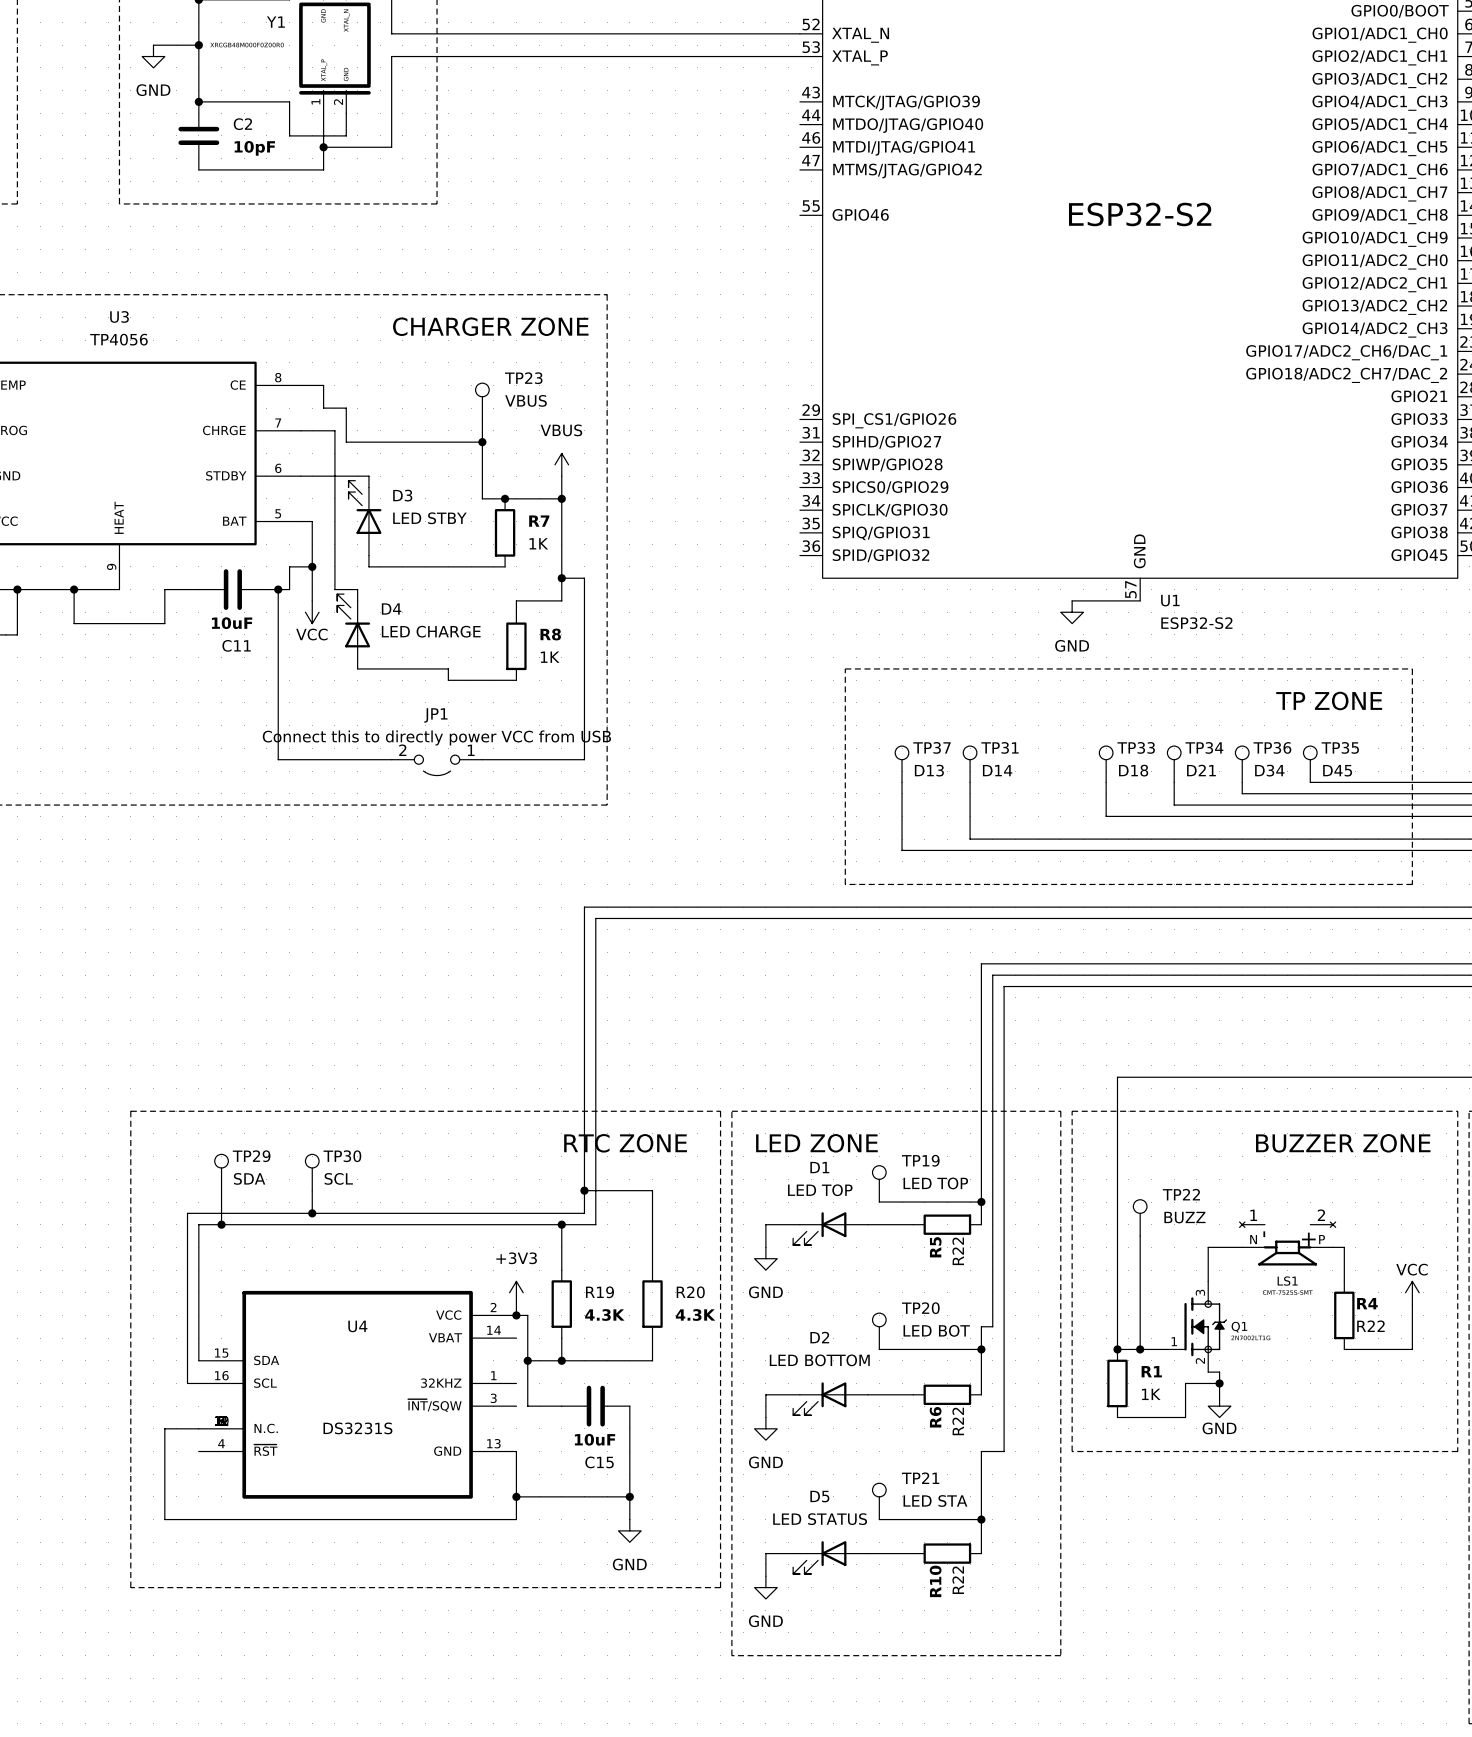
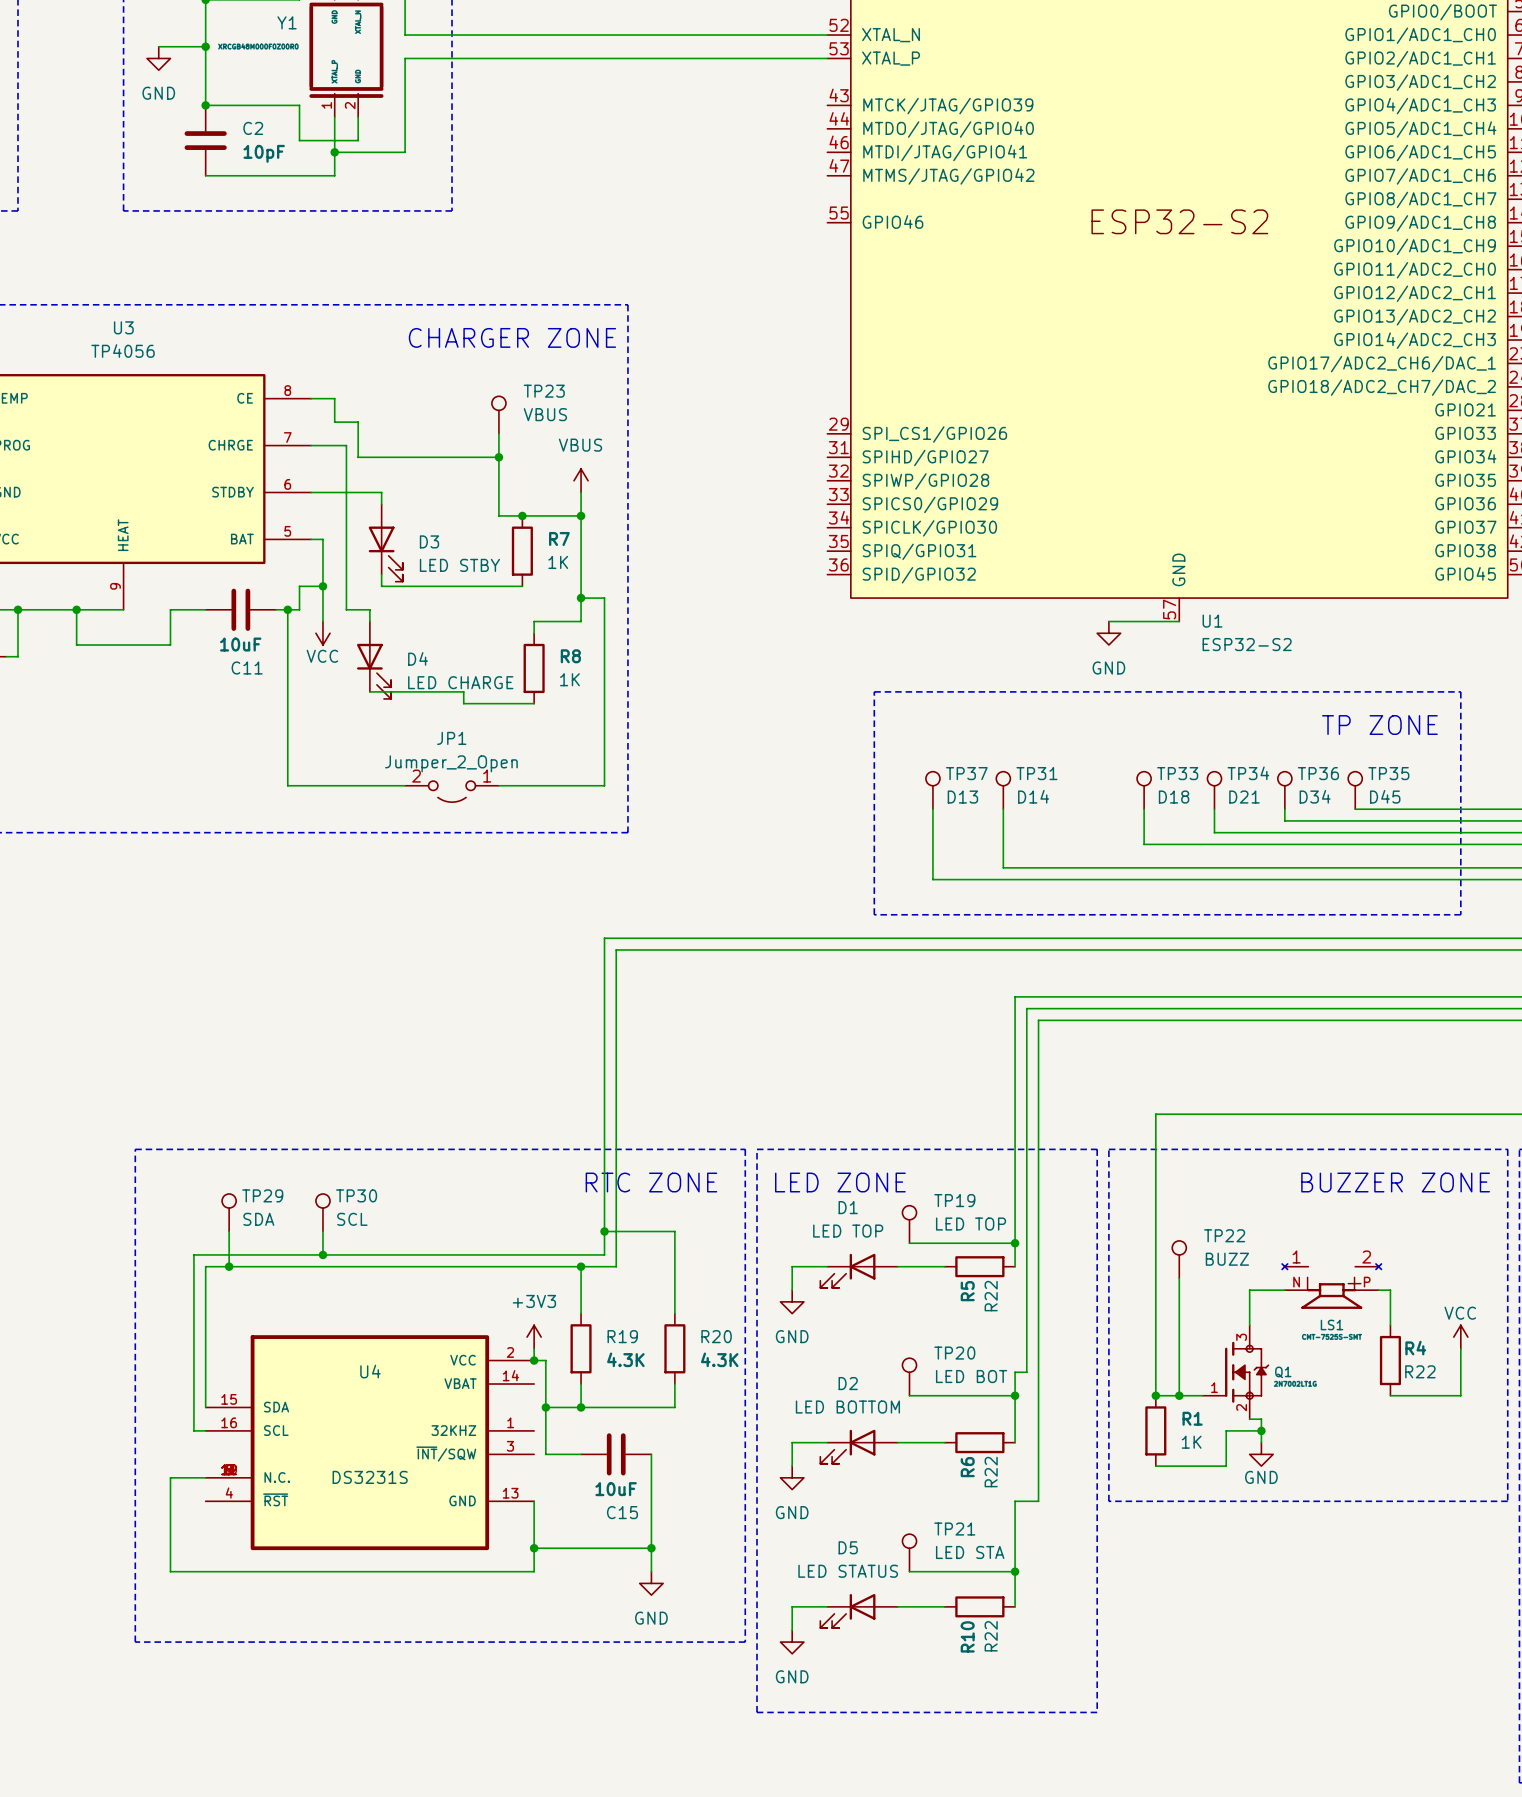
D3 name position: D3 (402, 495) -> D3 (429, 541)
D3 rotation: 0° (365, 507) -> 180° (385, 554)
D3 value position: LED STBY (429, 518) -> LED STBY (459, 565)
D4 name position: D4 (391, 609) -> D4 (418, 658)
D4 rotation: 0° (353, 620) -> 180° (374, 671)
D4 value position: LED CHARGE (431, 631) -> LED CHARGE (460, 682)
JP1 value: Connect this to directly power VCC from USB (436, 737) -> Jumper_2_Open (451, 763)

